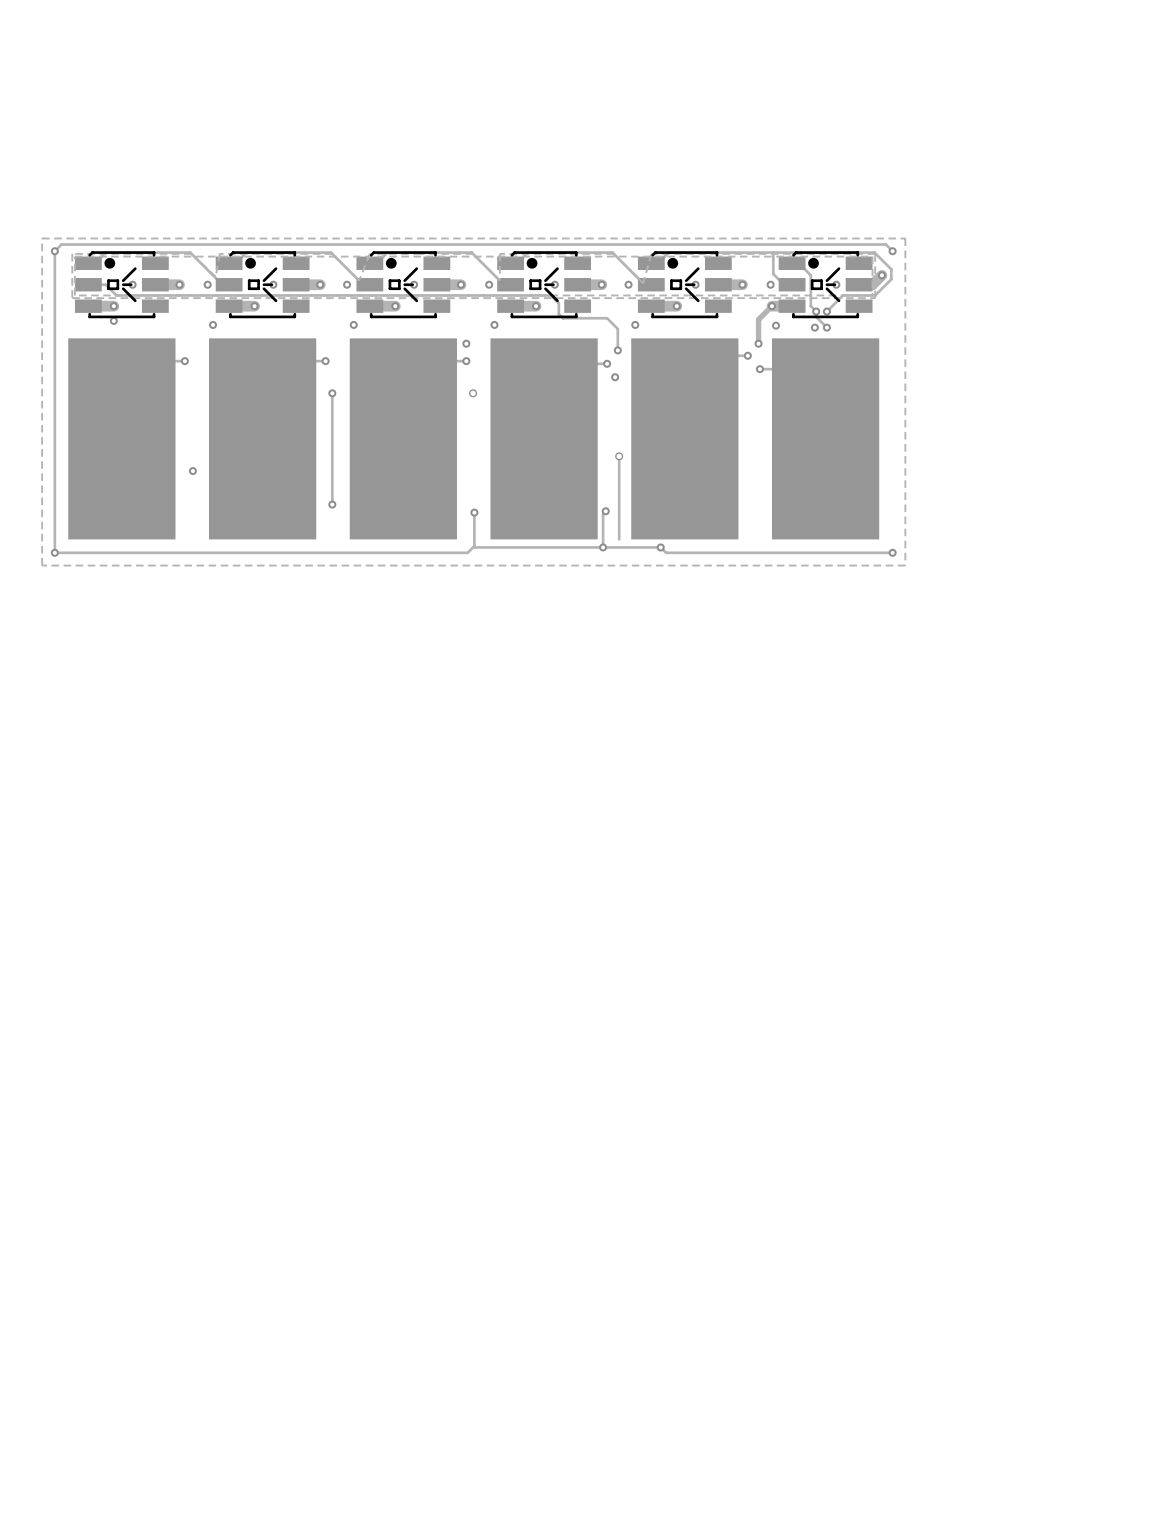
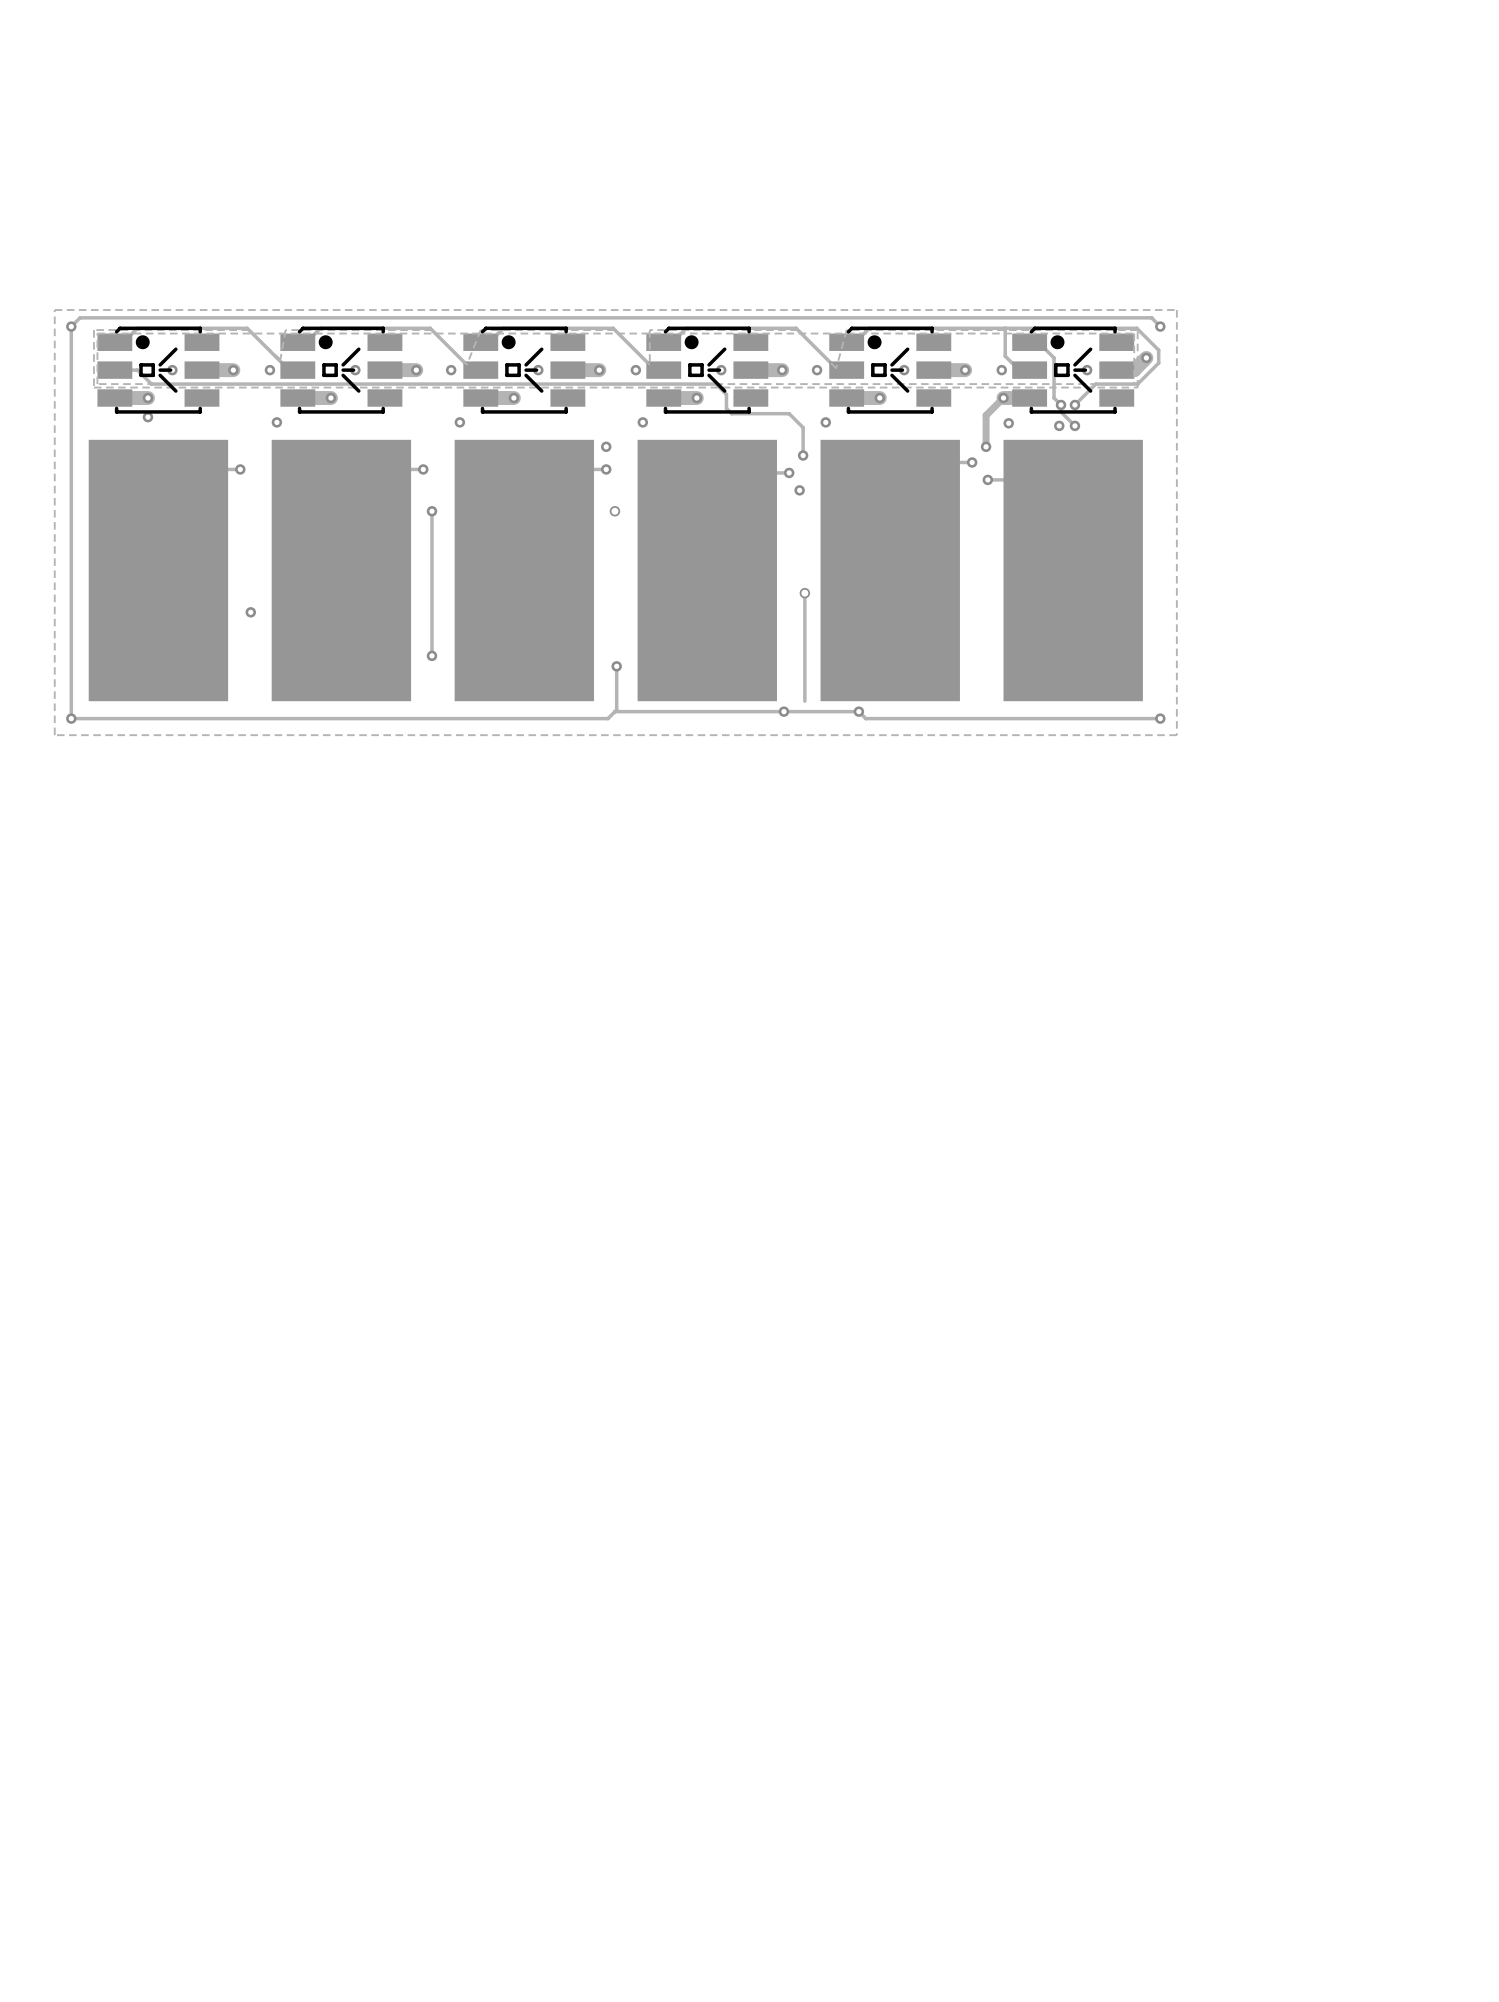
track: (605, 511) (603, 513) (603, 547) -> none
via: (605, 511) -> none

